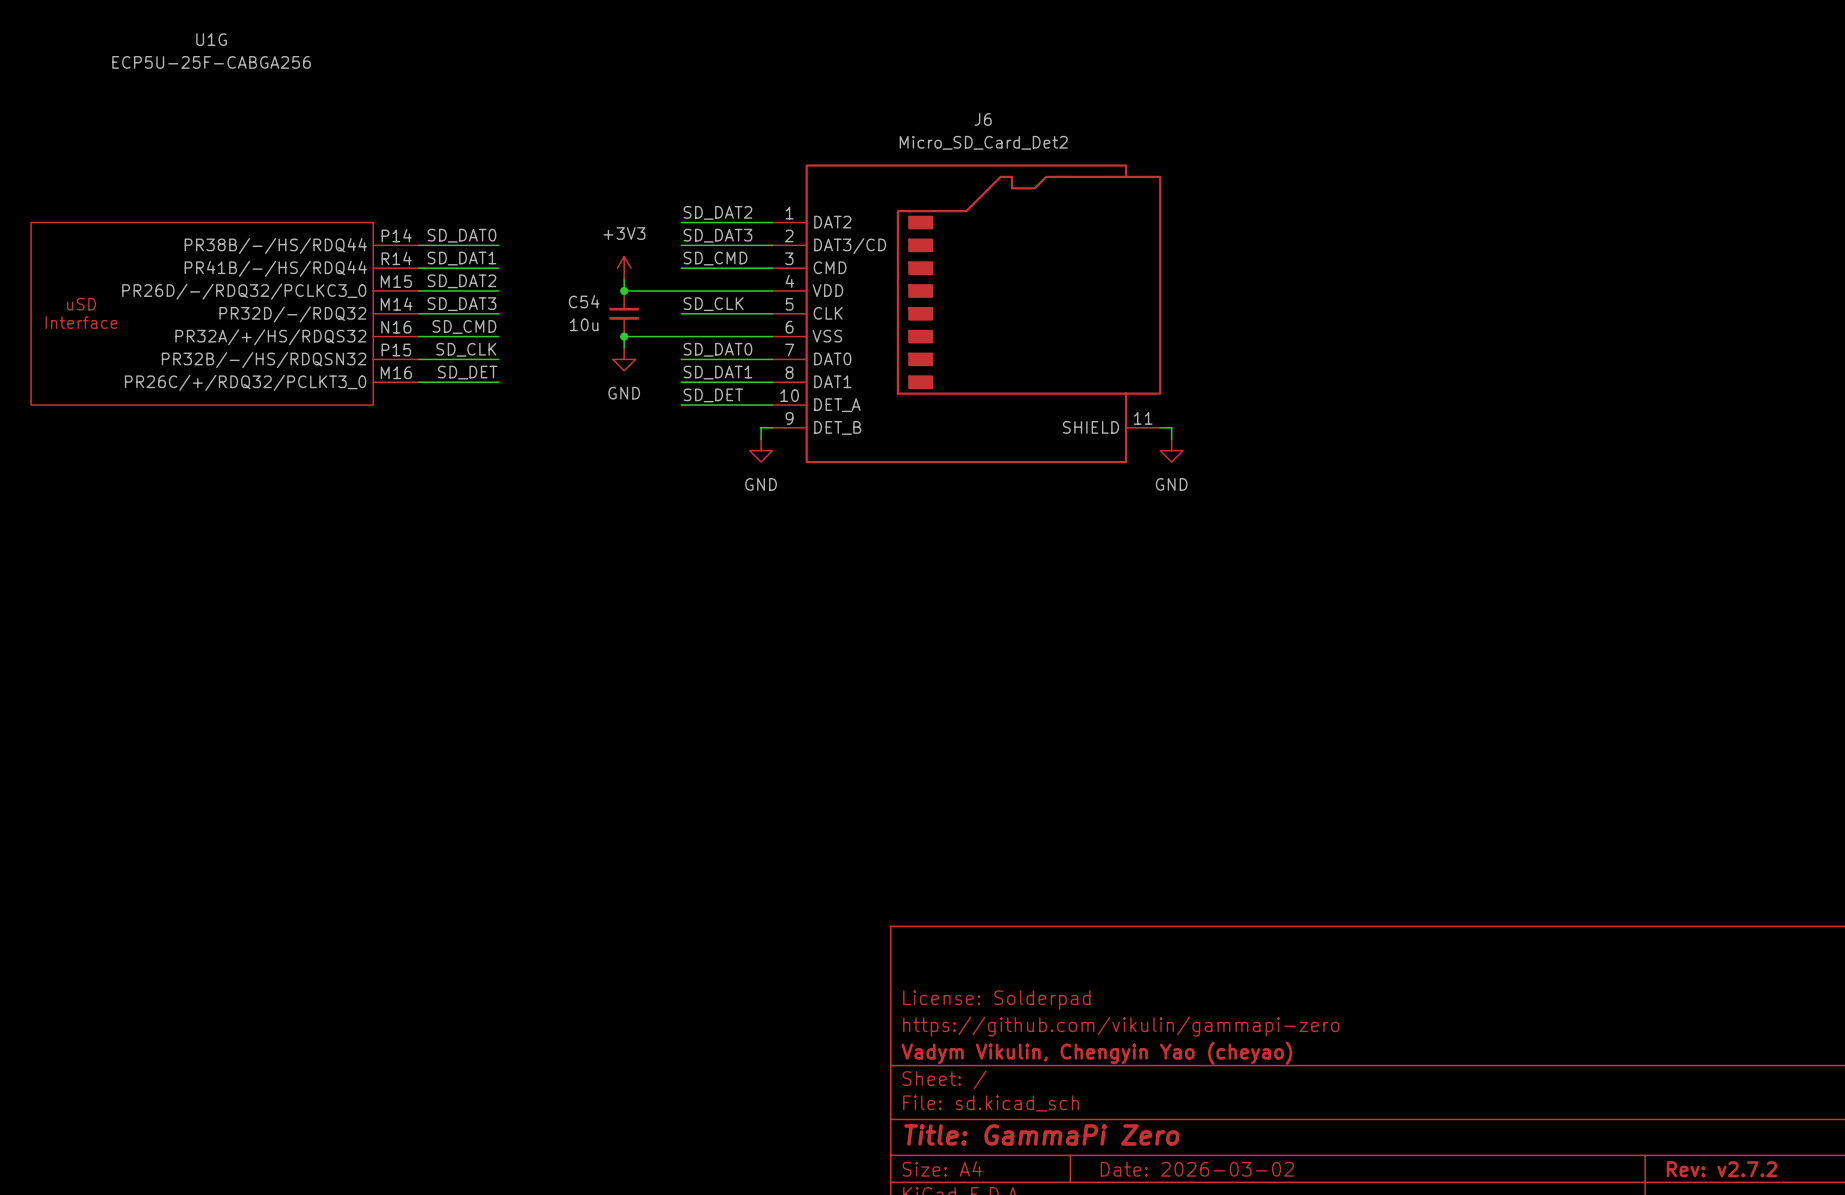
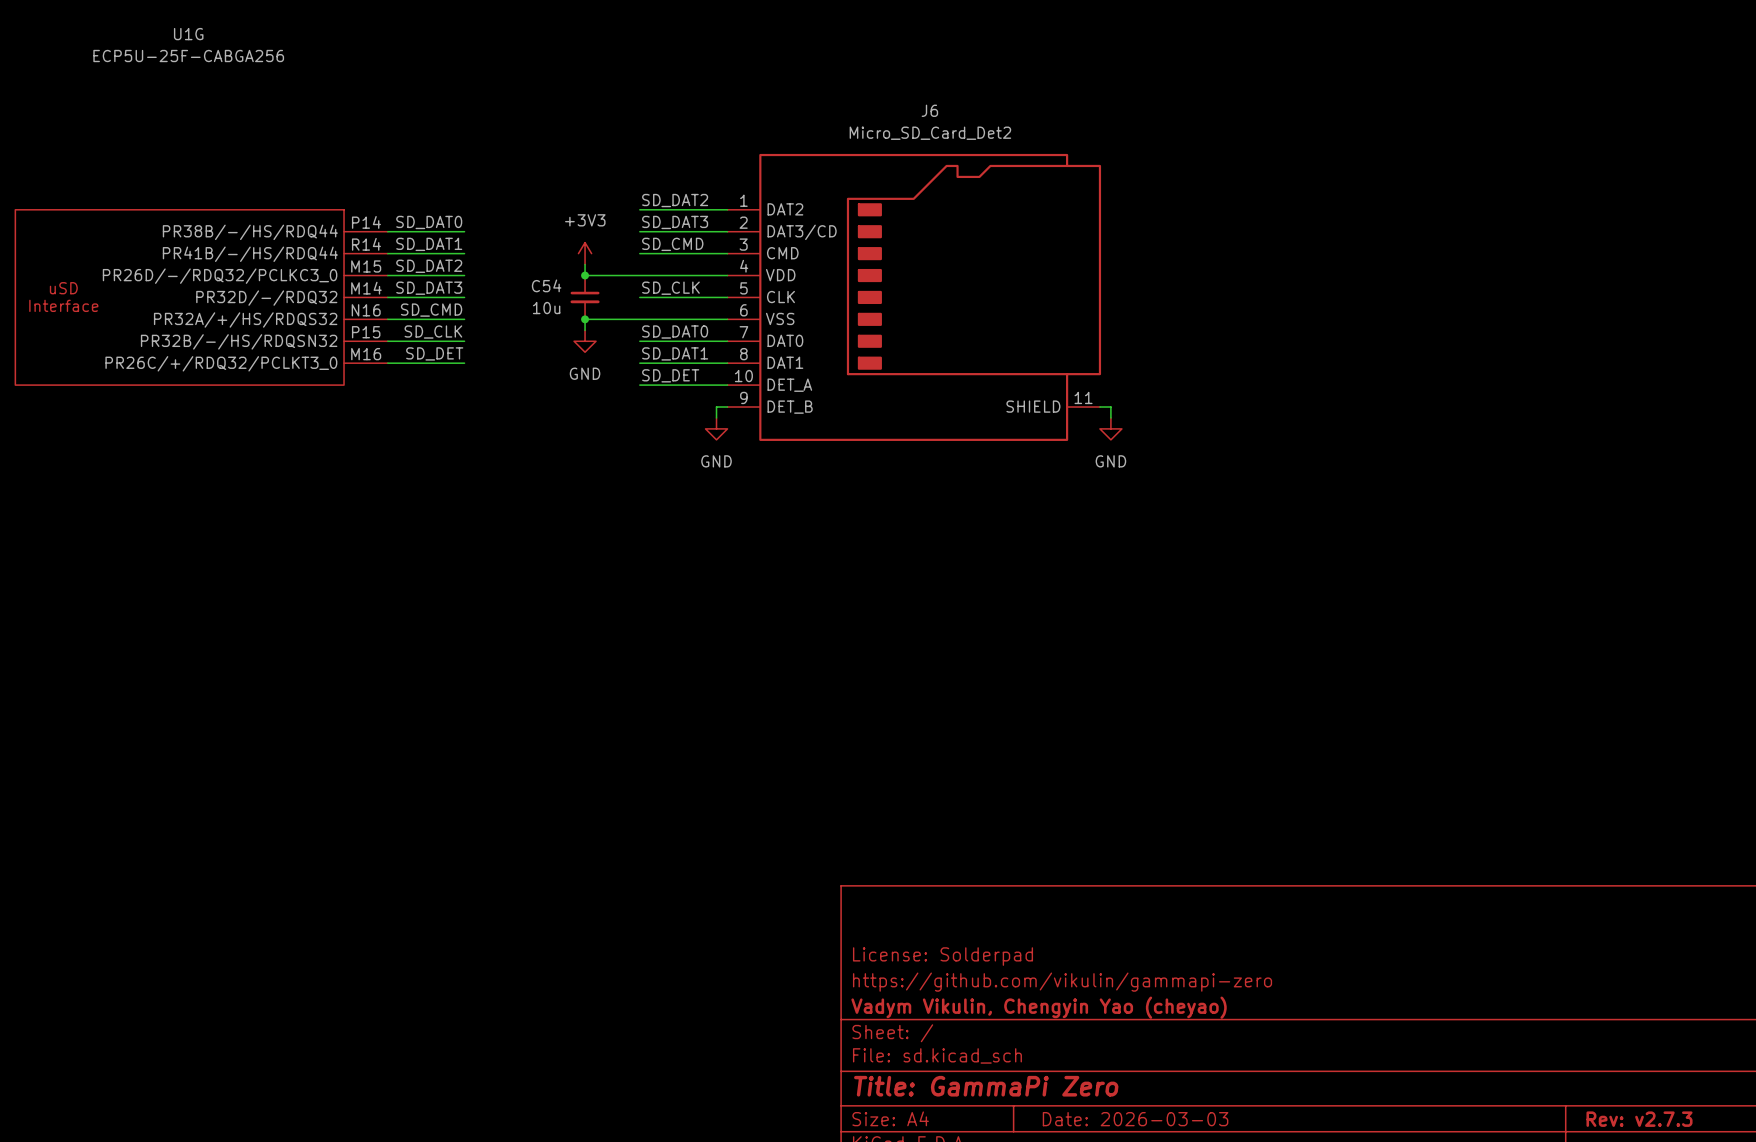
title block: Date: 2026-03-02 (1197, 1169) -> Date: 2026-03-03 (1135, 1119)
title block: Rev: v2.7.2 (1721, 1169) -> Rev: v2.7.3 (1639, 1119)

